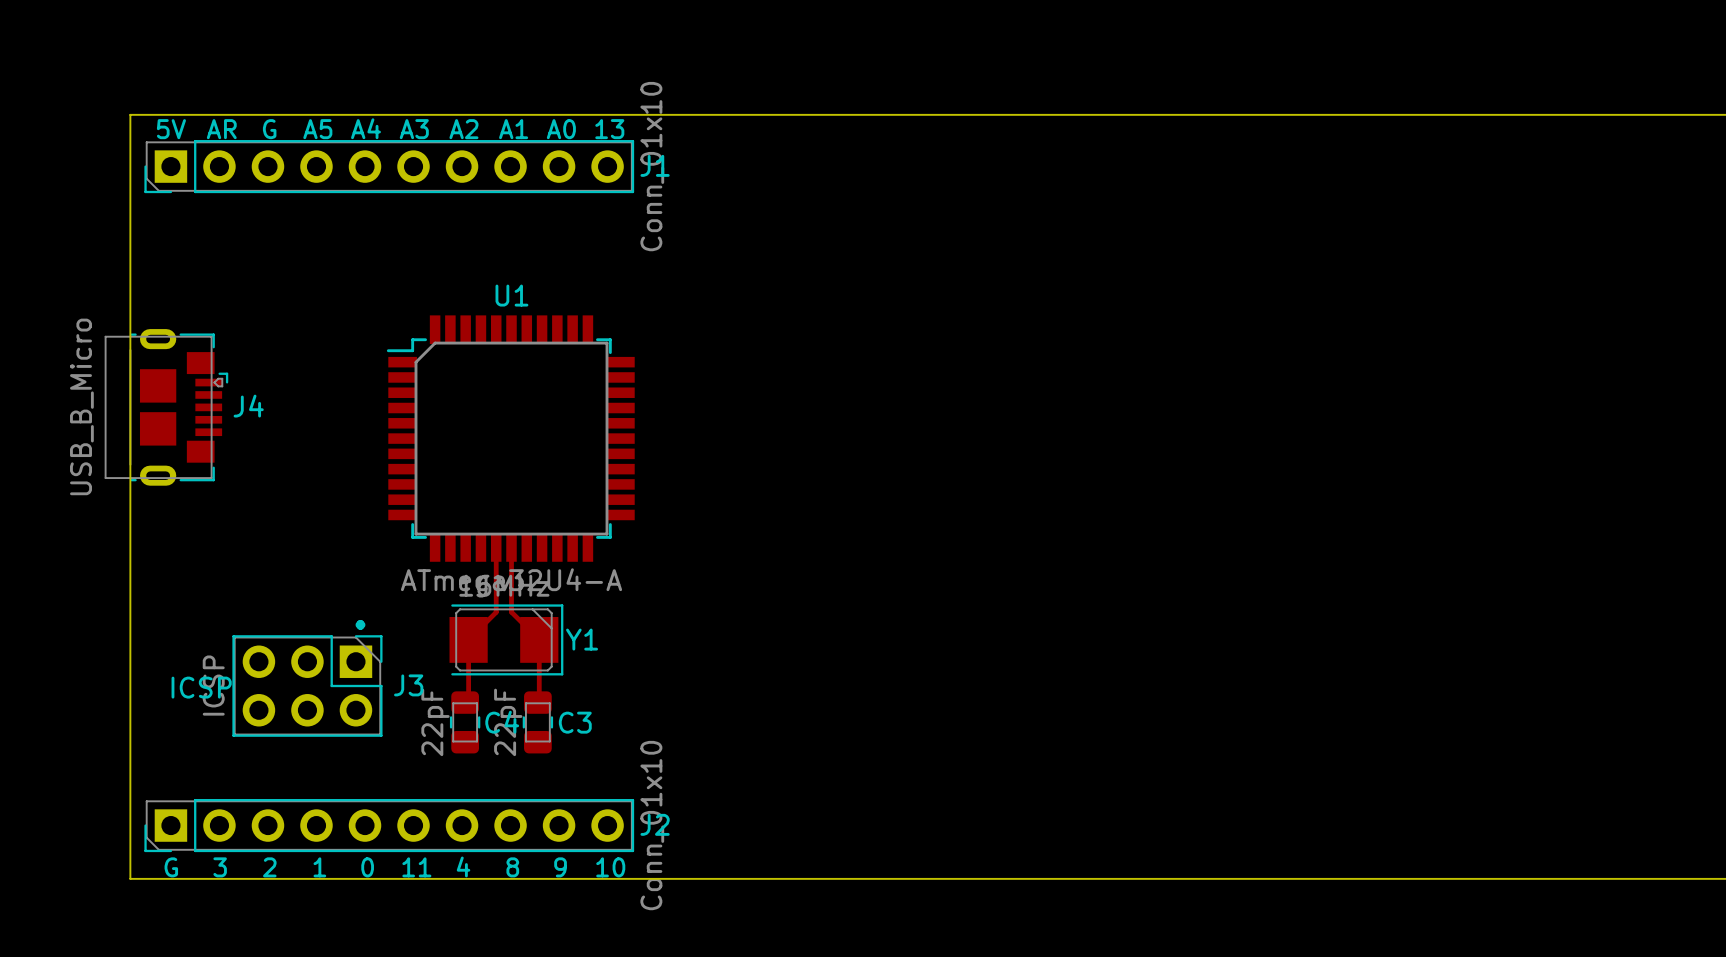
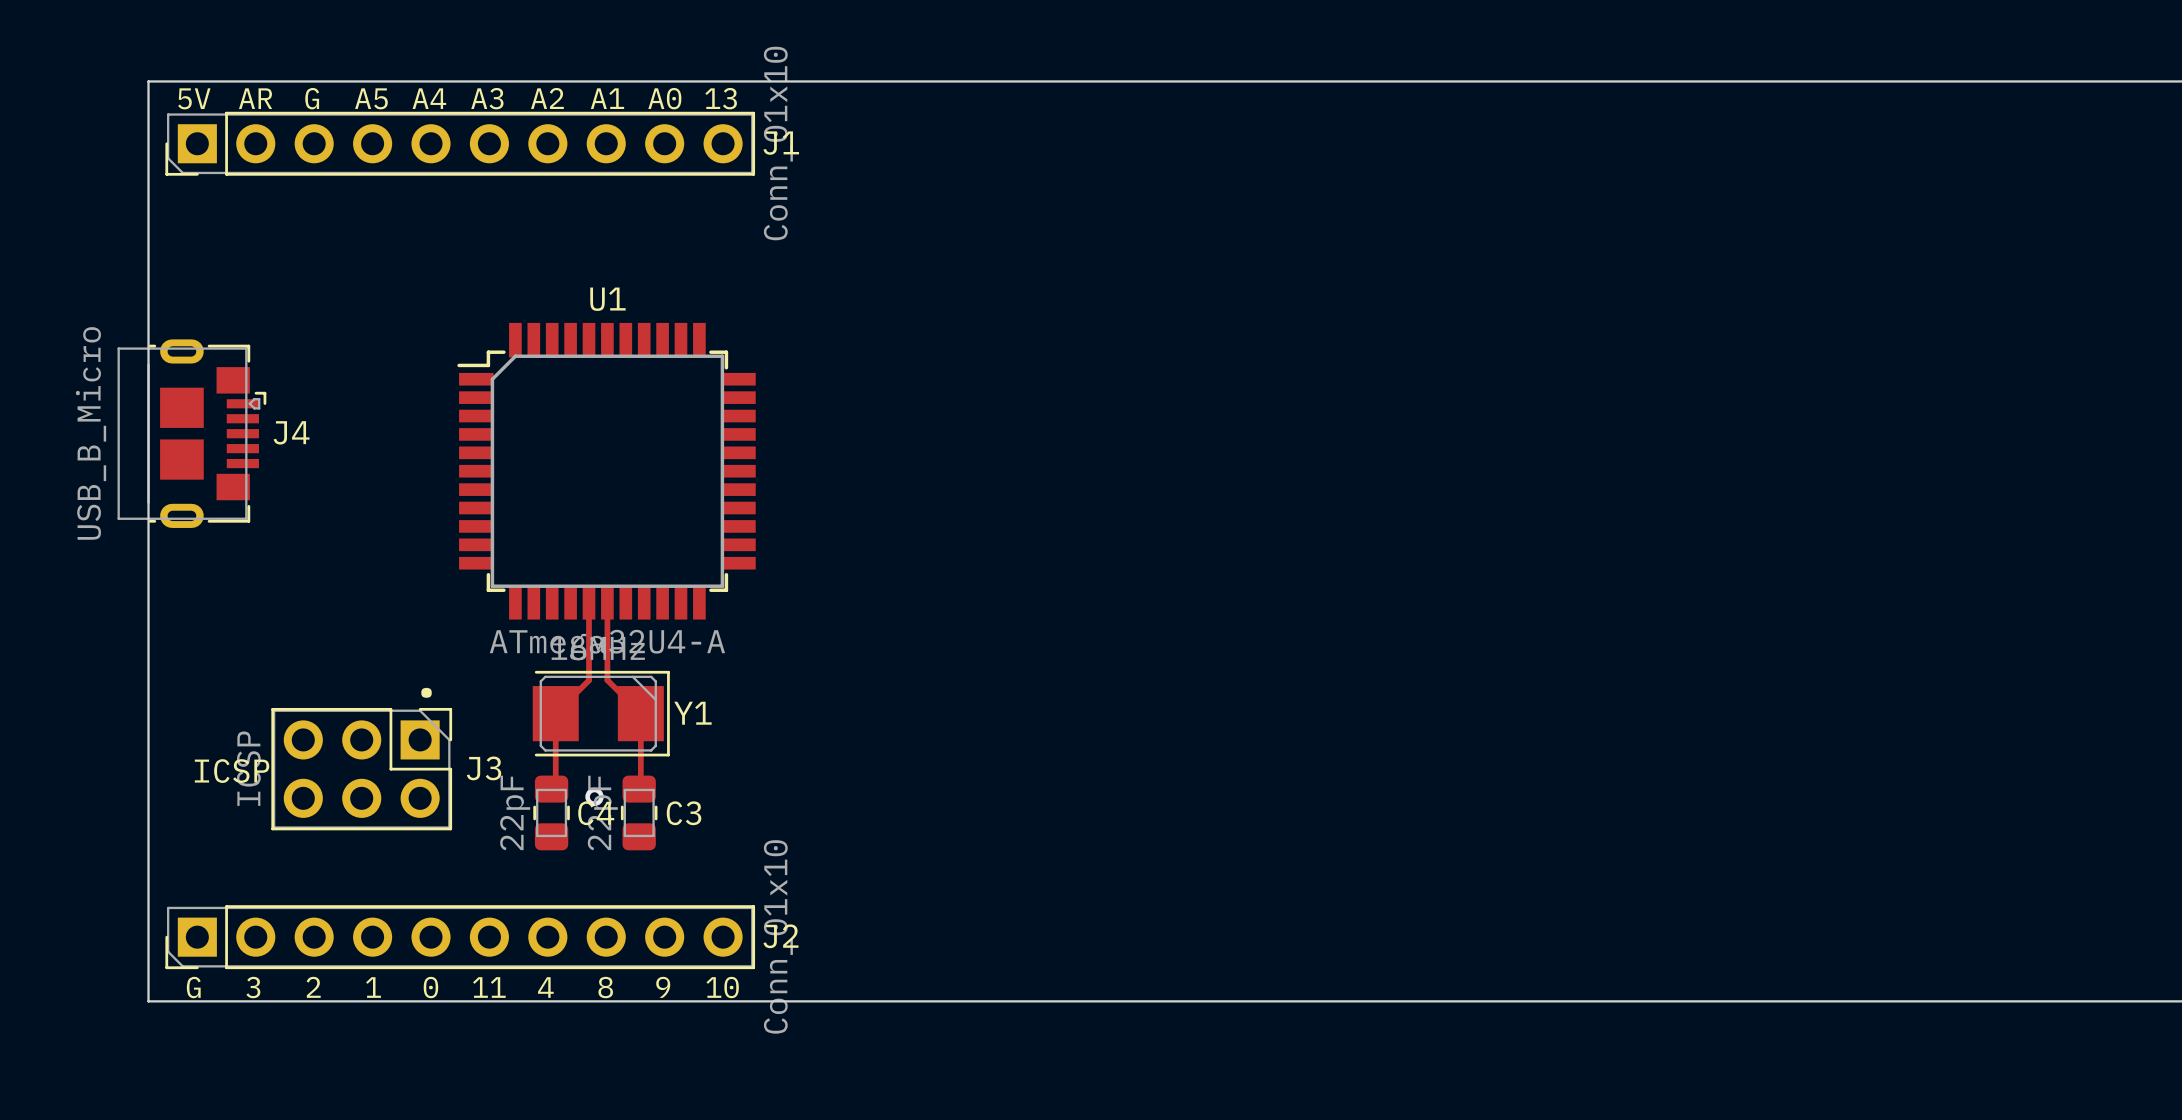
via: none -> (594, 796)

